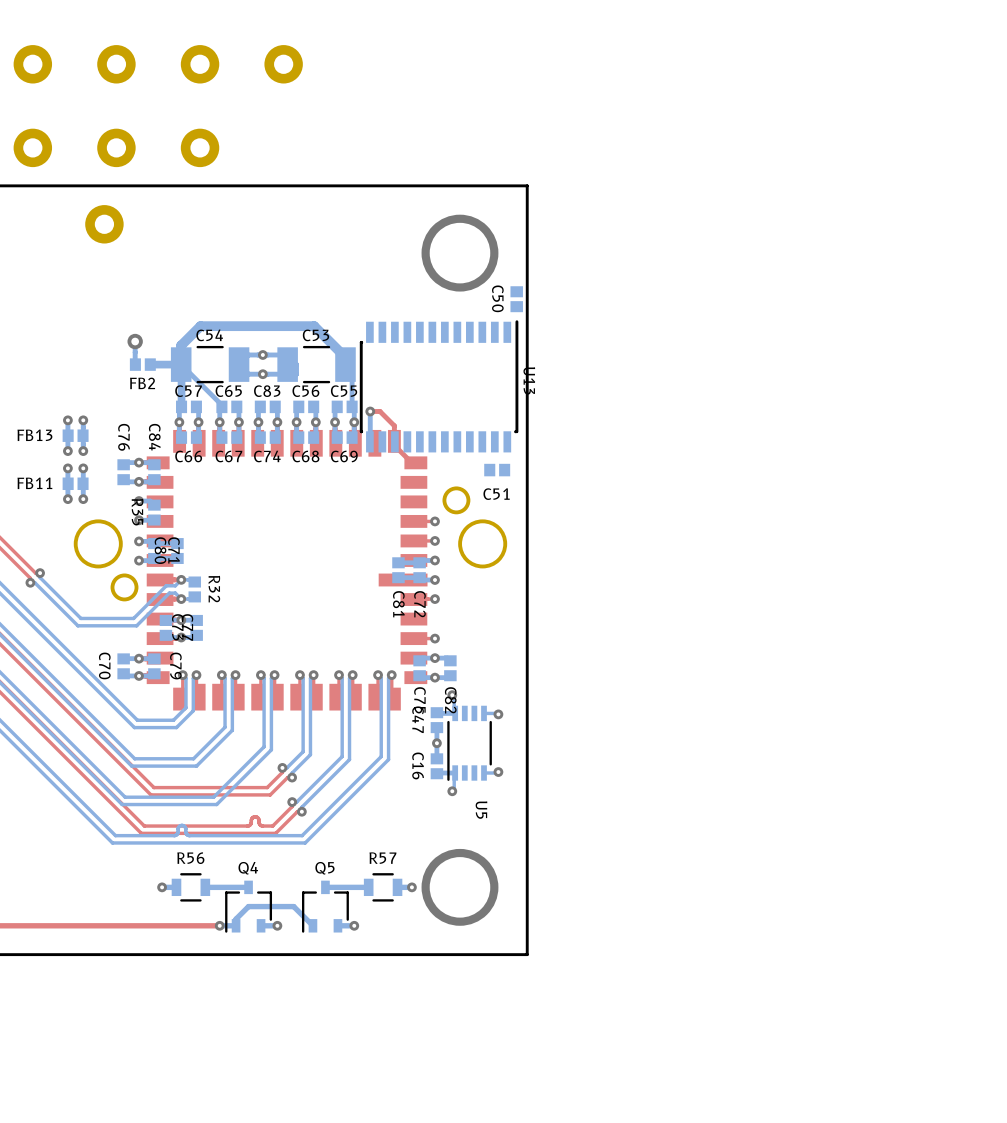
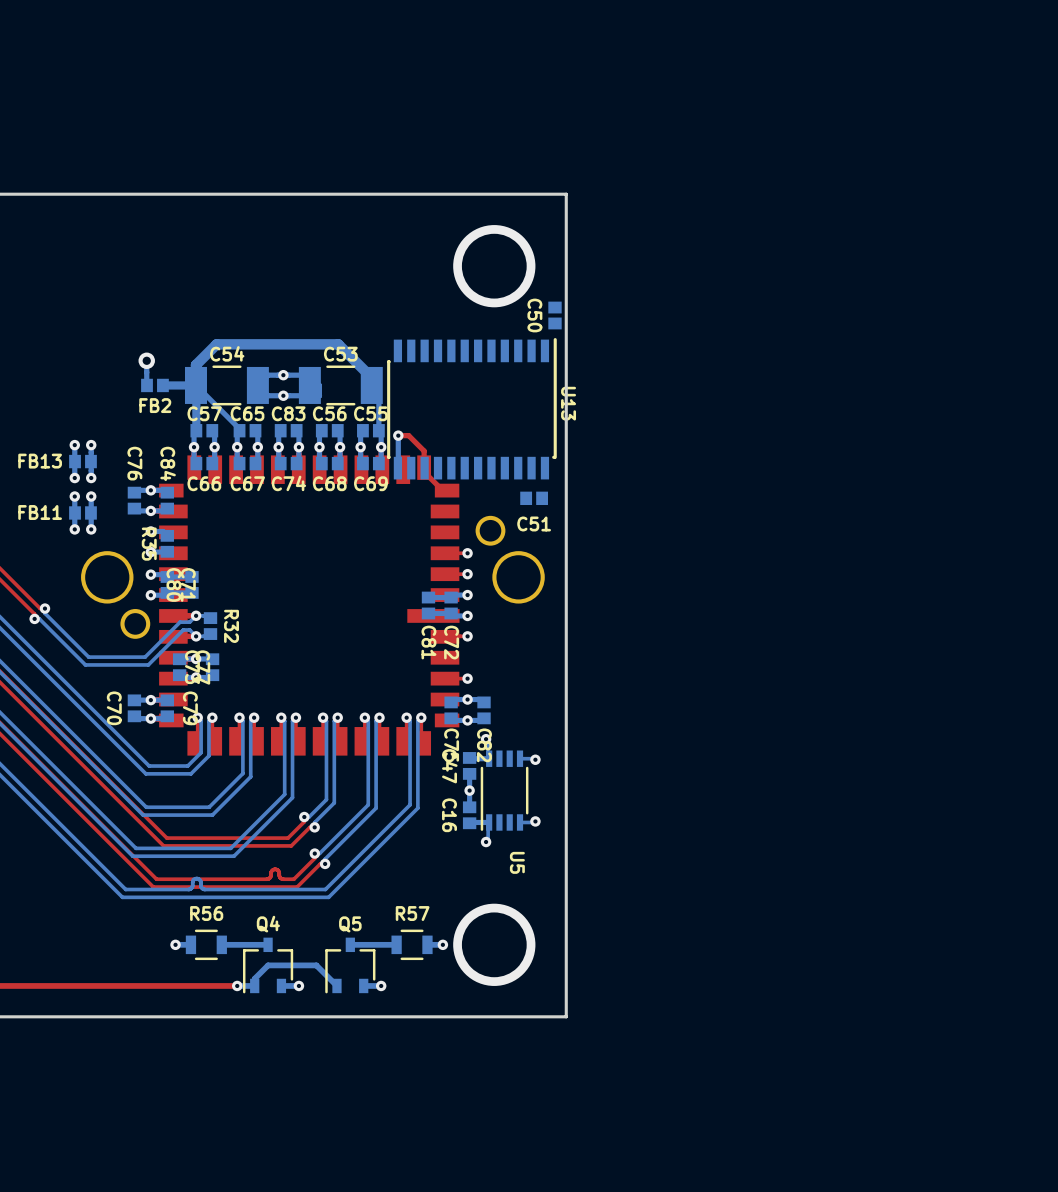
part: (32, 64) -> none
part: (116, 64) -> none
part: (200, 64) -> none
part: (283, 64) -> none
part: (32, 147) -> none
part: (116, 147) -> none
part: (200, 147) -> none
part: (104, 224) -> none

